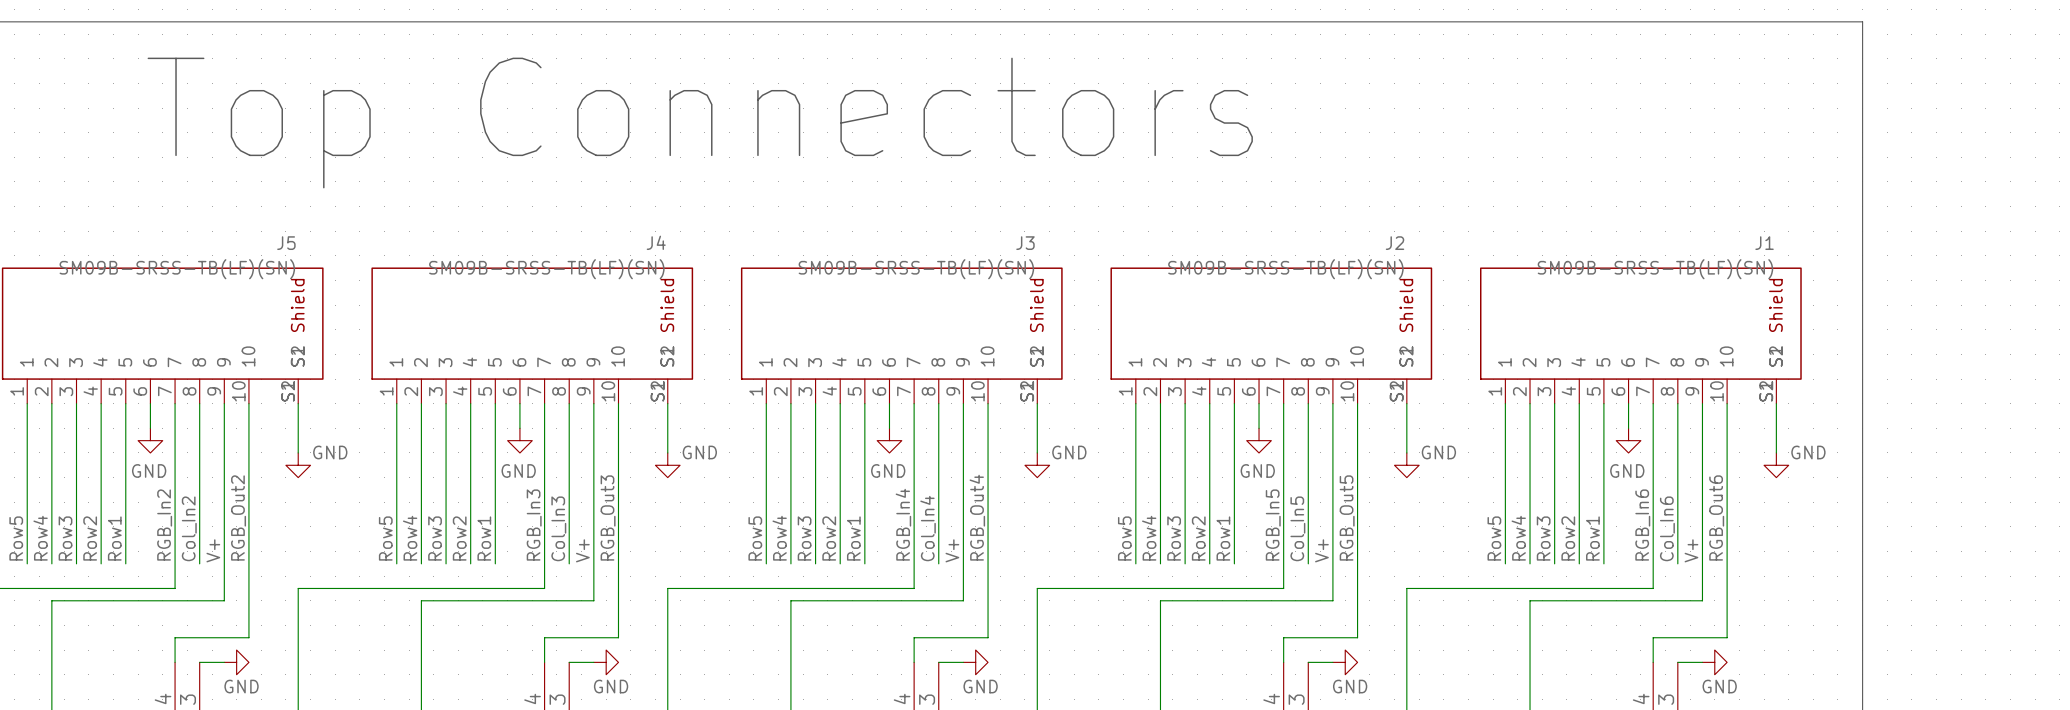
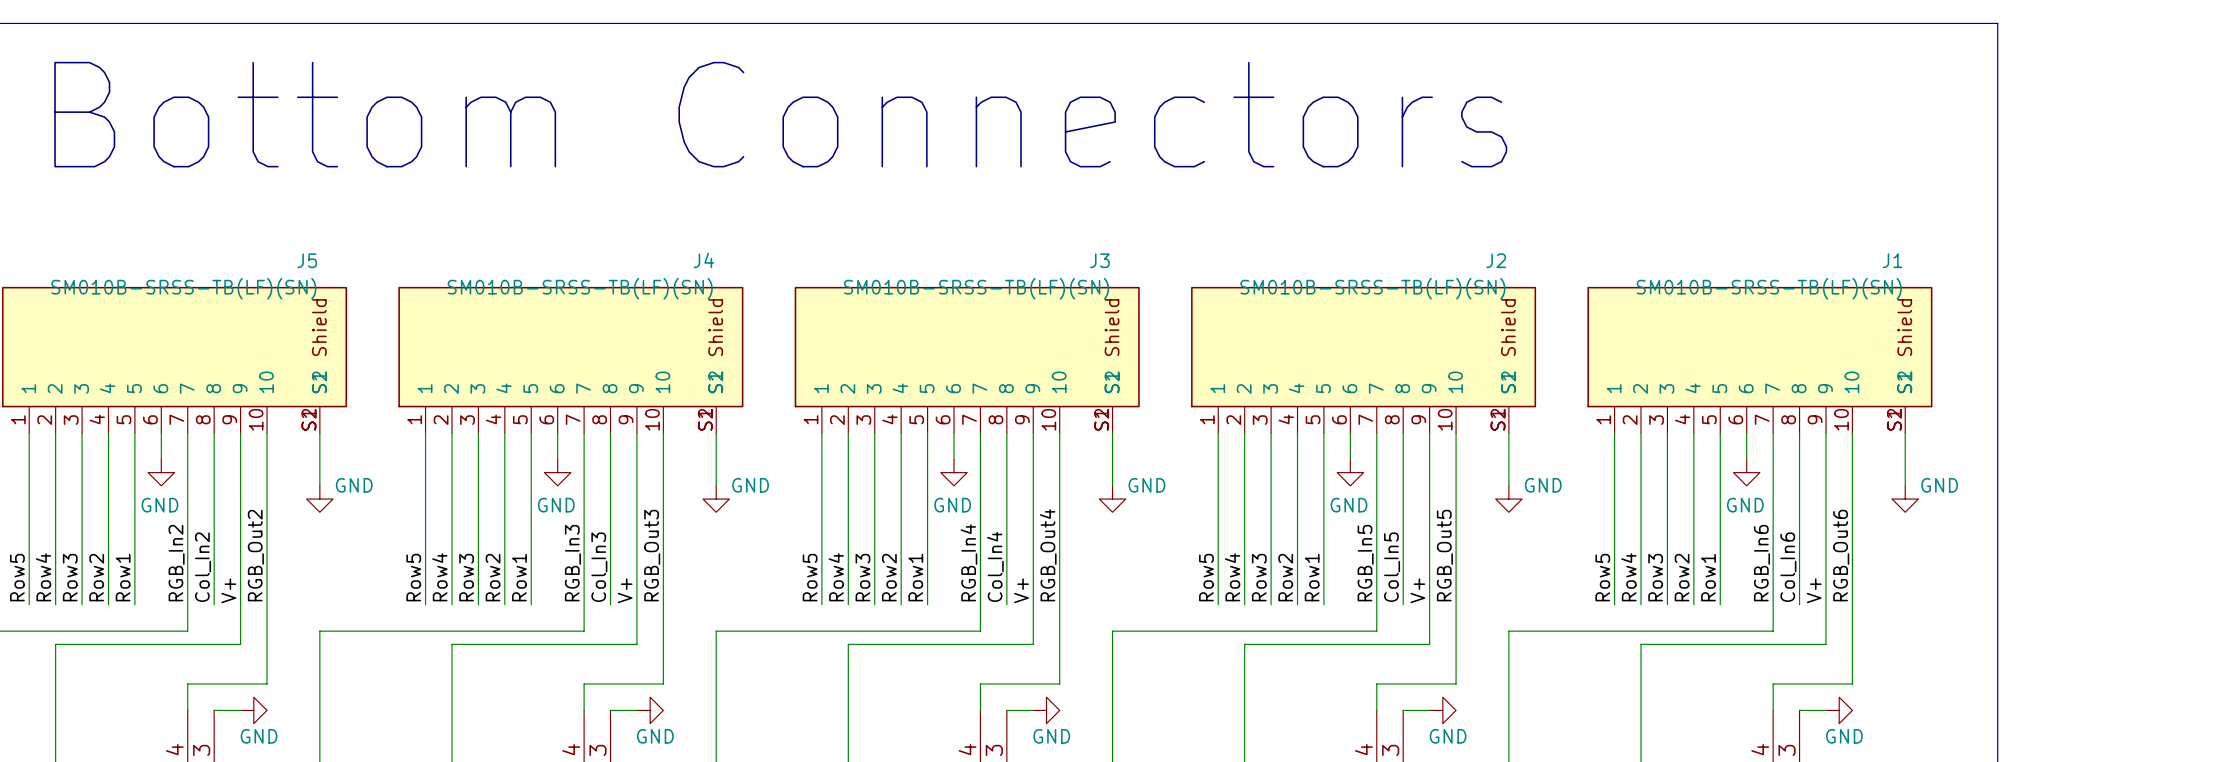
text: Top Connectors (700, 123) -> Bottom Connectors (780, 114)
J5 value: SM09B-SRSS-TB(LF)(SN) (177, 269) -> SM010B-SRSS-TB(LF)(SN) (183, 288)
J4 value: SM09B-SRSS-TB(LF)(SN) (546, 269) -> SM010B-SRSS-TB(LF)(SN) (580, 288)
J3 value: SM09B-SRSS-TB(LF)(SN) (916, 269) -> SM010B-SRSS-TB(LF)(SN) (976, 288)
J2 value: SM09B-SRSS-TB(LF)(SN) (1285, 269) -> SM010B-SRSS-TB(LF)(SN) (1372, 288)
J1 value: SM09B-SRSS-TB(LF)(SN) (1655, 269) -> SM010B-SRSS-TB(LF)(SN) (1769, 288)

